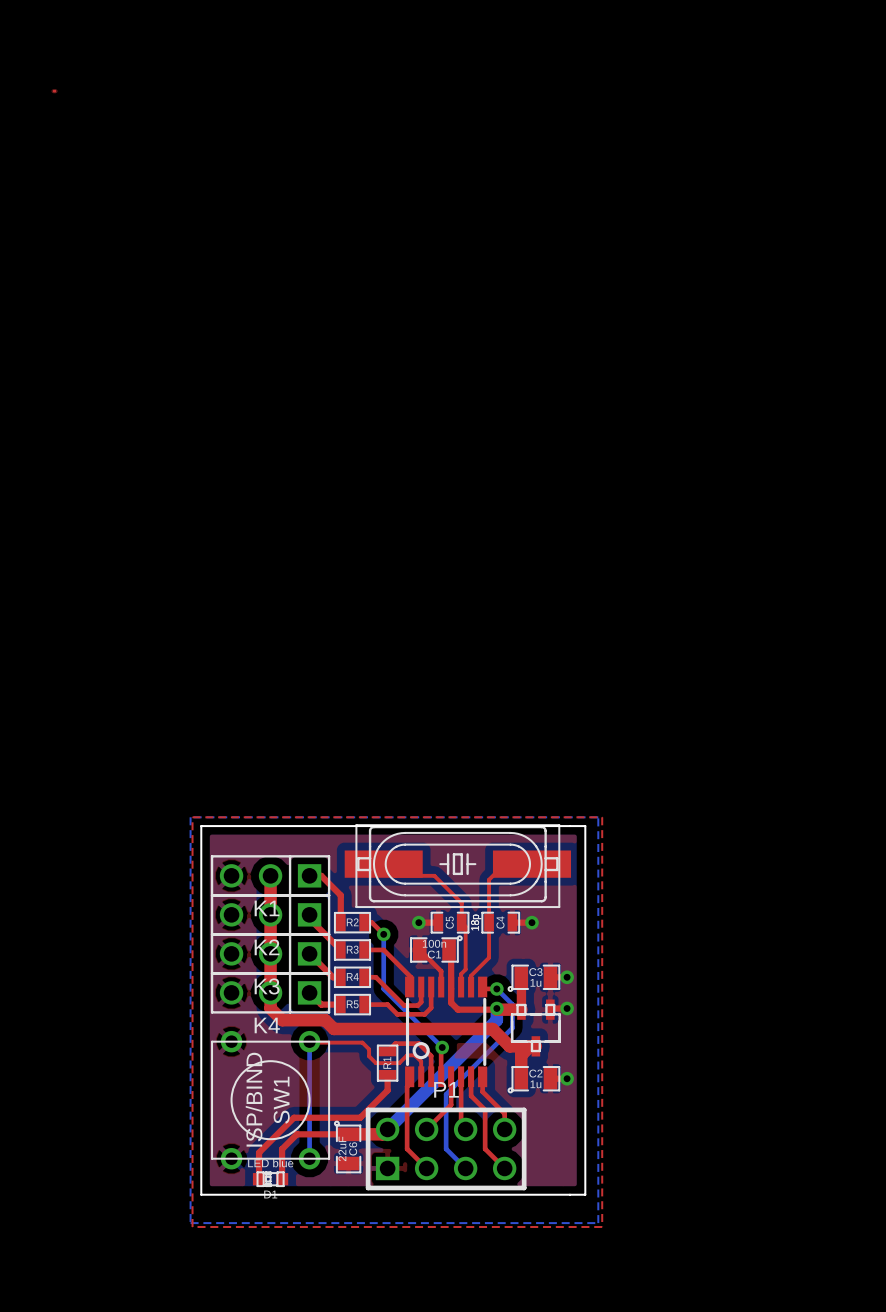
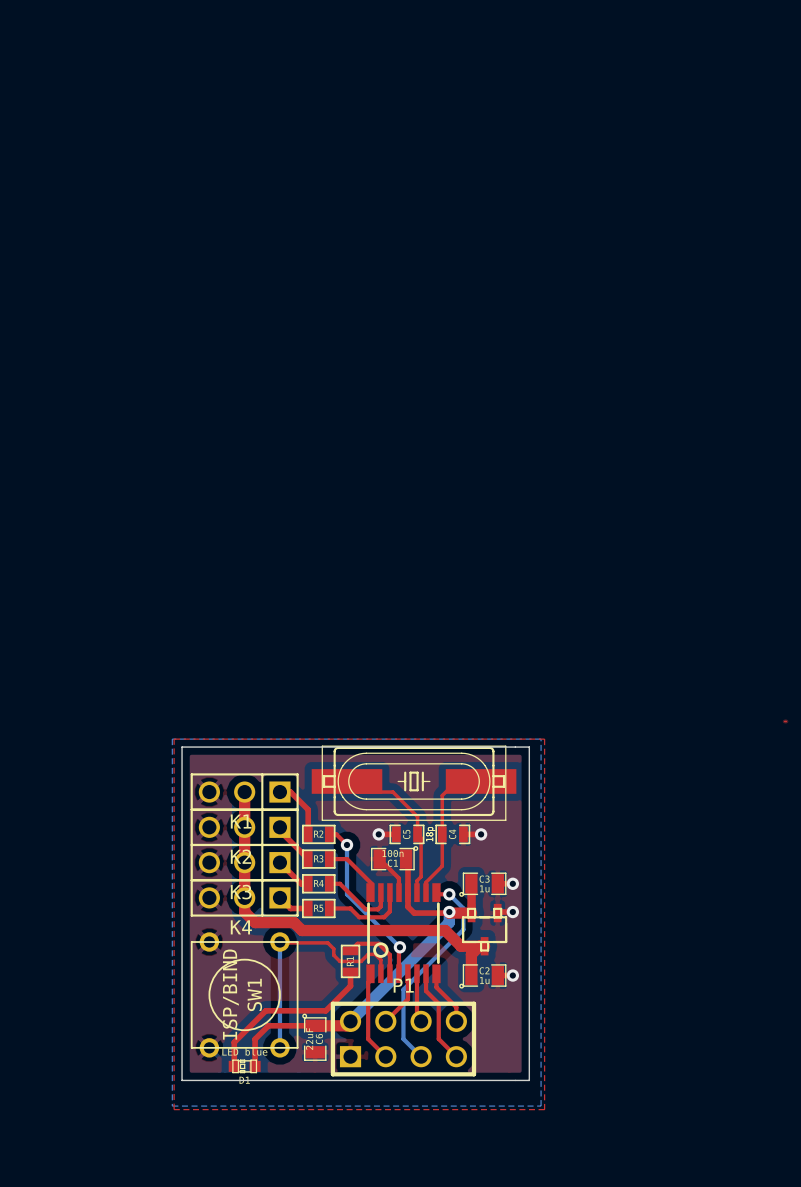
top zone outline: (53, 91) (55, 91) (53, 91) -> none
top zone outline: none -> (784, 721) (786, 721) (784, 721)

